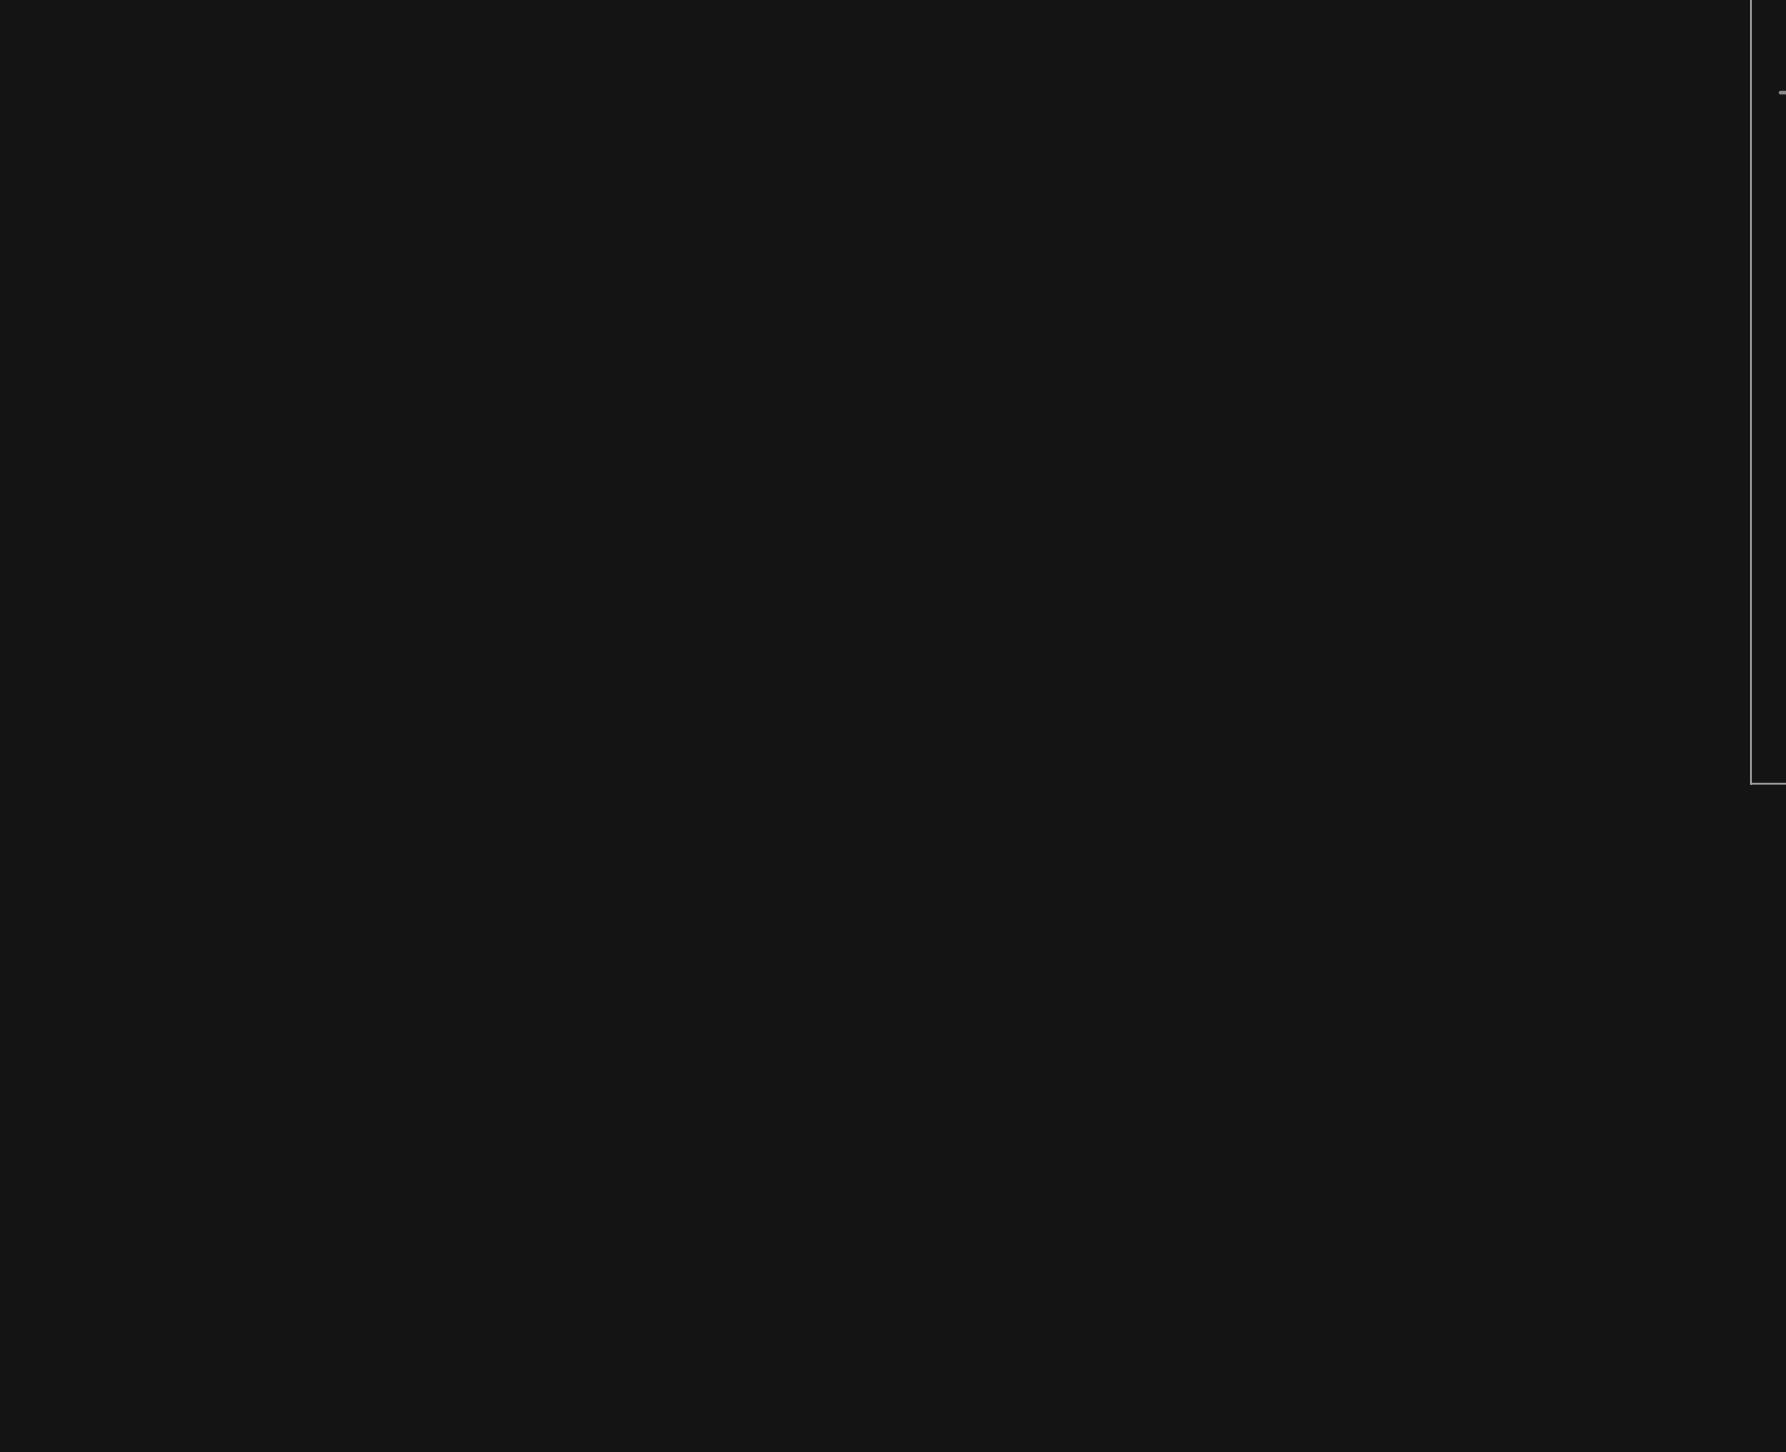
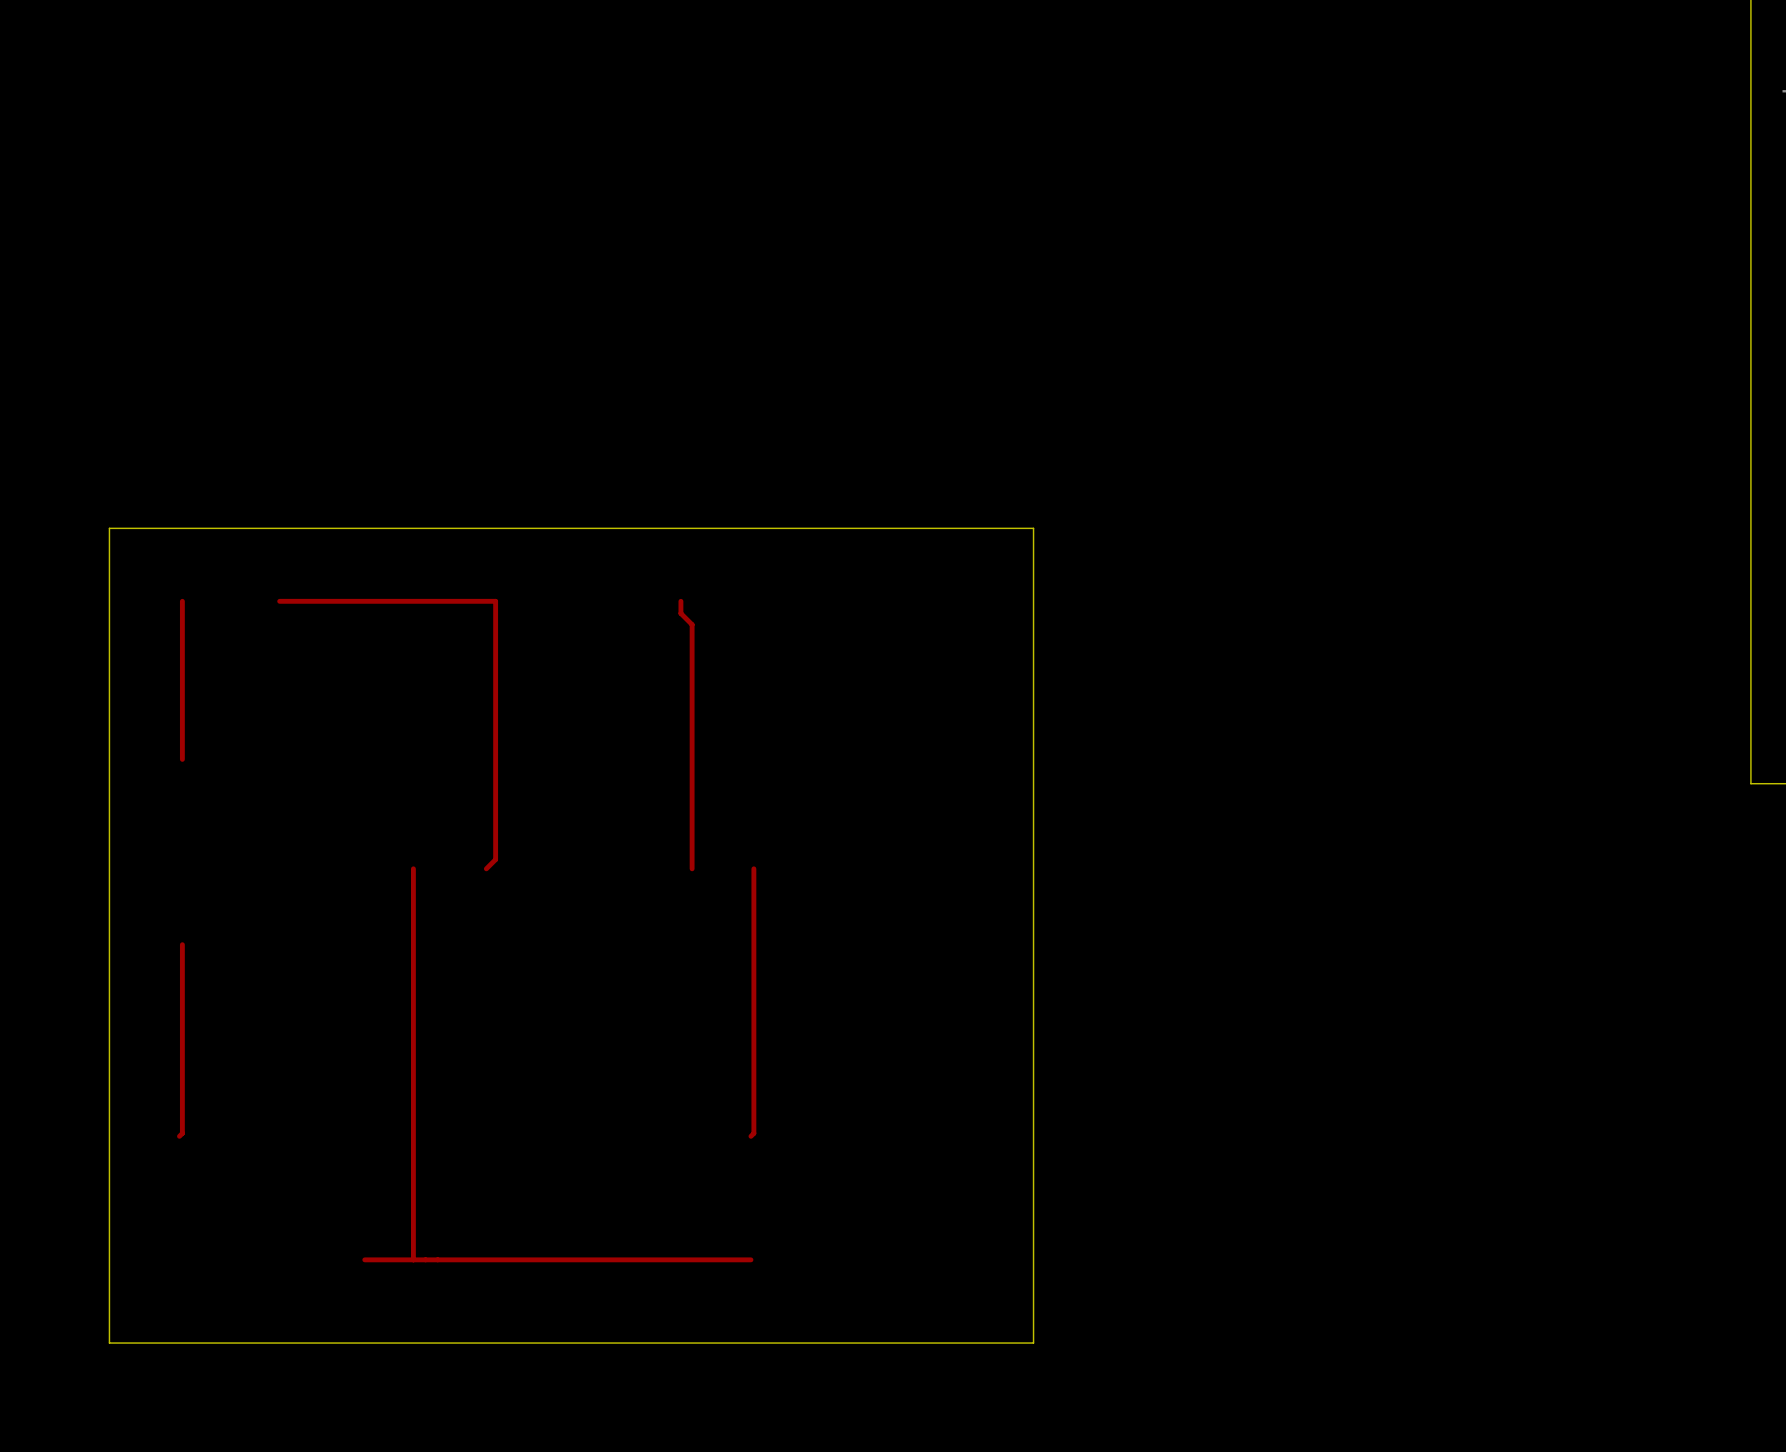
board edge: none -> (109, 528) (1033, 528) (1033, 1343) (109, 1343) (109, 528)
track: none -> (182, 601) (182, 759)
track: none -> (279, 601) (495, 601) (495, 859) (486, 868)
track: none -> (680, 601) (680, 613) (692, 624) (692, 868)
track: none -> (413, 868) (413, 1259)
track: none -> (753, 868) (753, 1133) (750, 1136)
track: none -> (182, 944) (182, 1133) (179, 1136)
track: none -> (364, 1259) (750, 1259)

